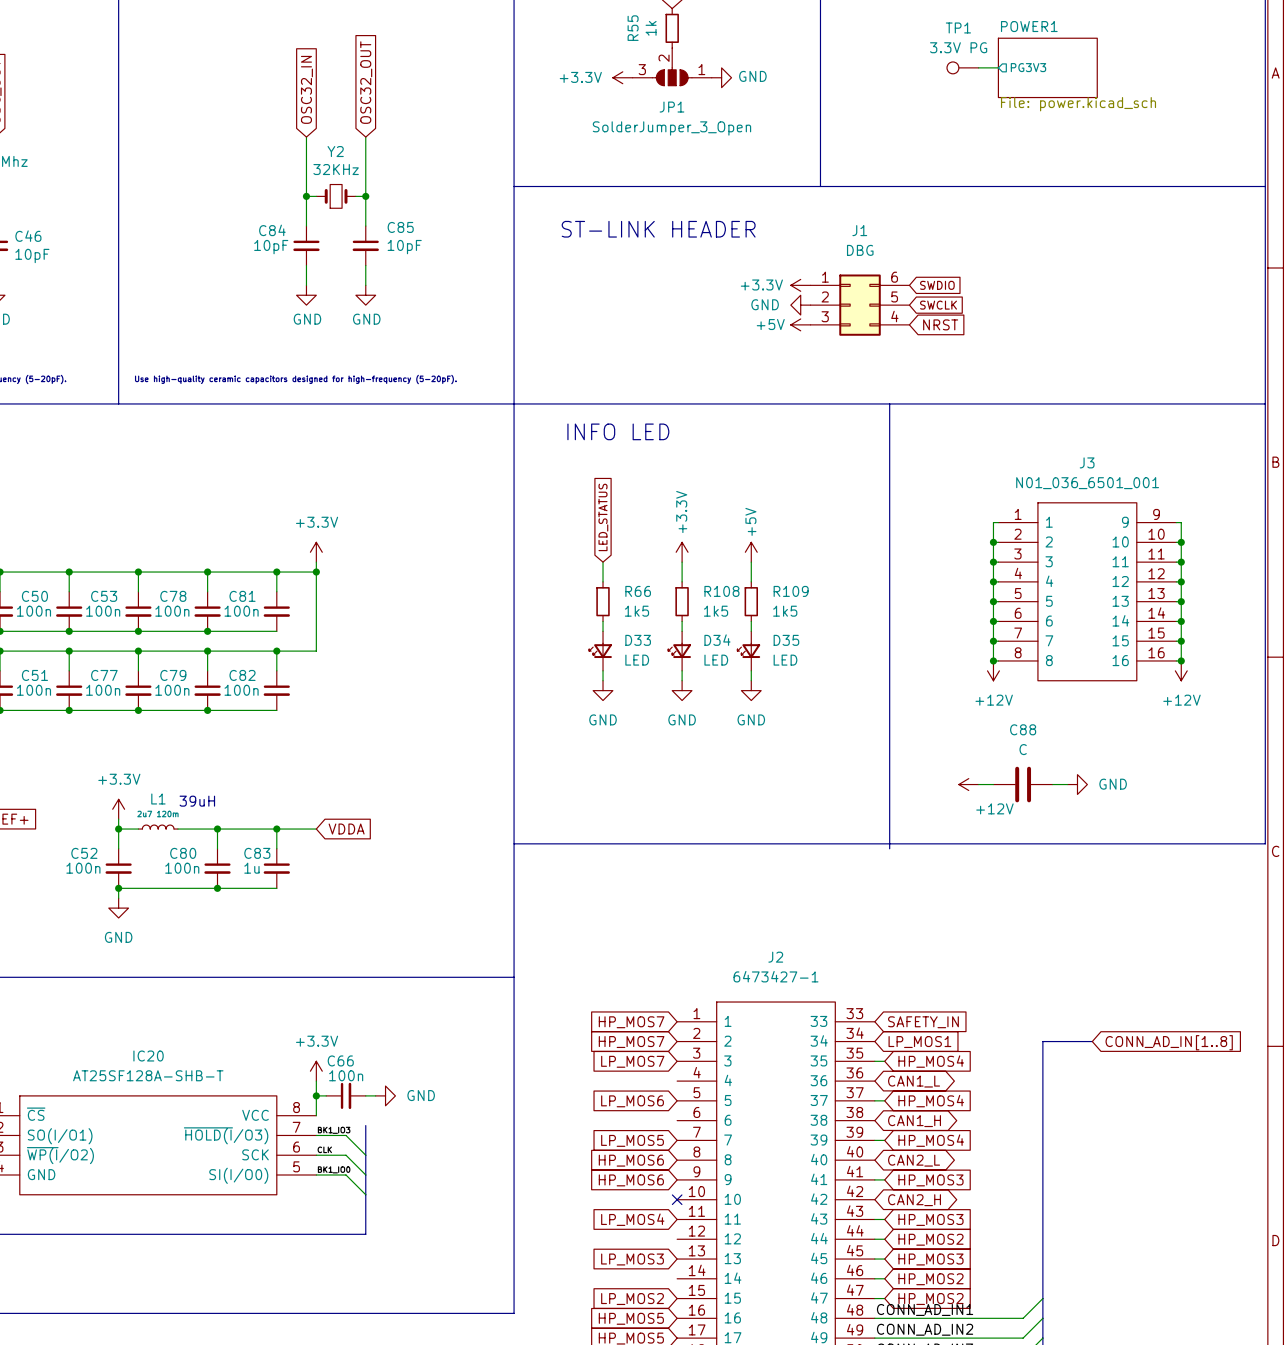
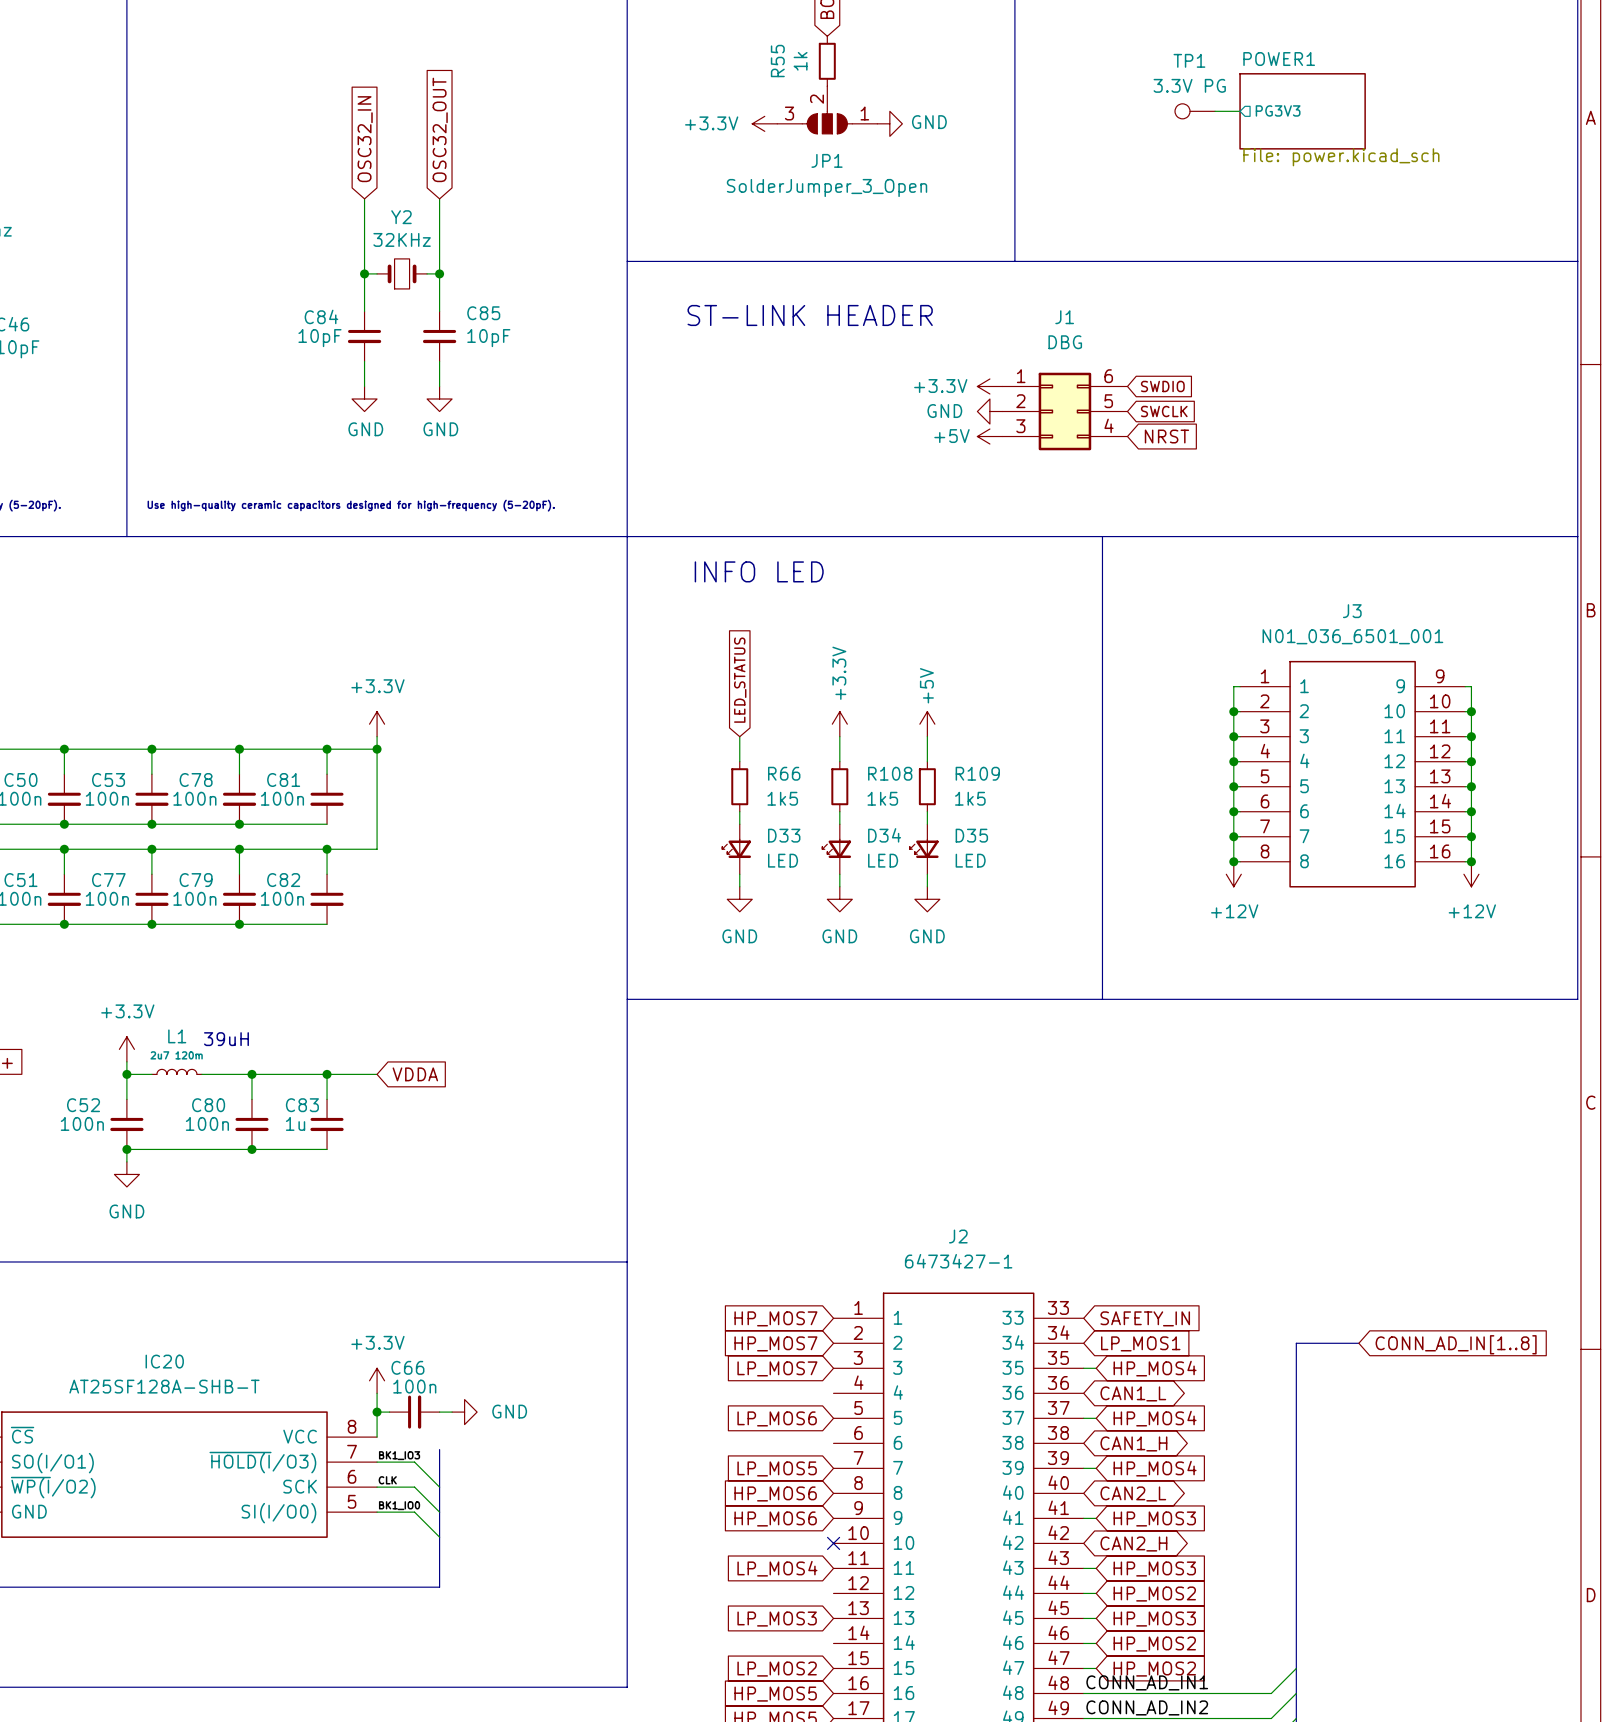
line: (889, 769) (889, 848) -> none
line: (1265, 769) (1265, 843) (514, 843) -> (1577, 999) (627, 999)
power symbol: +12V (968, 784) -> none
wire: (978, 784) (993, 784) -> none
C88: C (1023, 784) -> none
wire: (1052, 784) (1067, 784) -> none
power symbol: GND (1077, 784) -> none

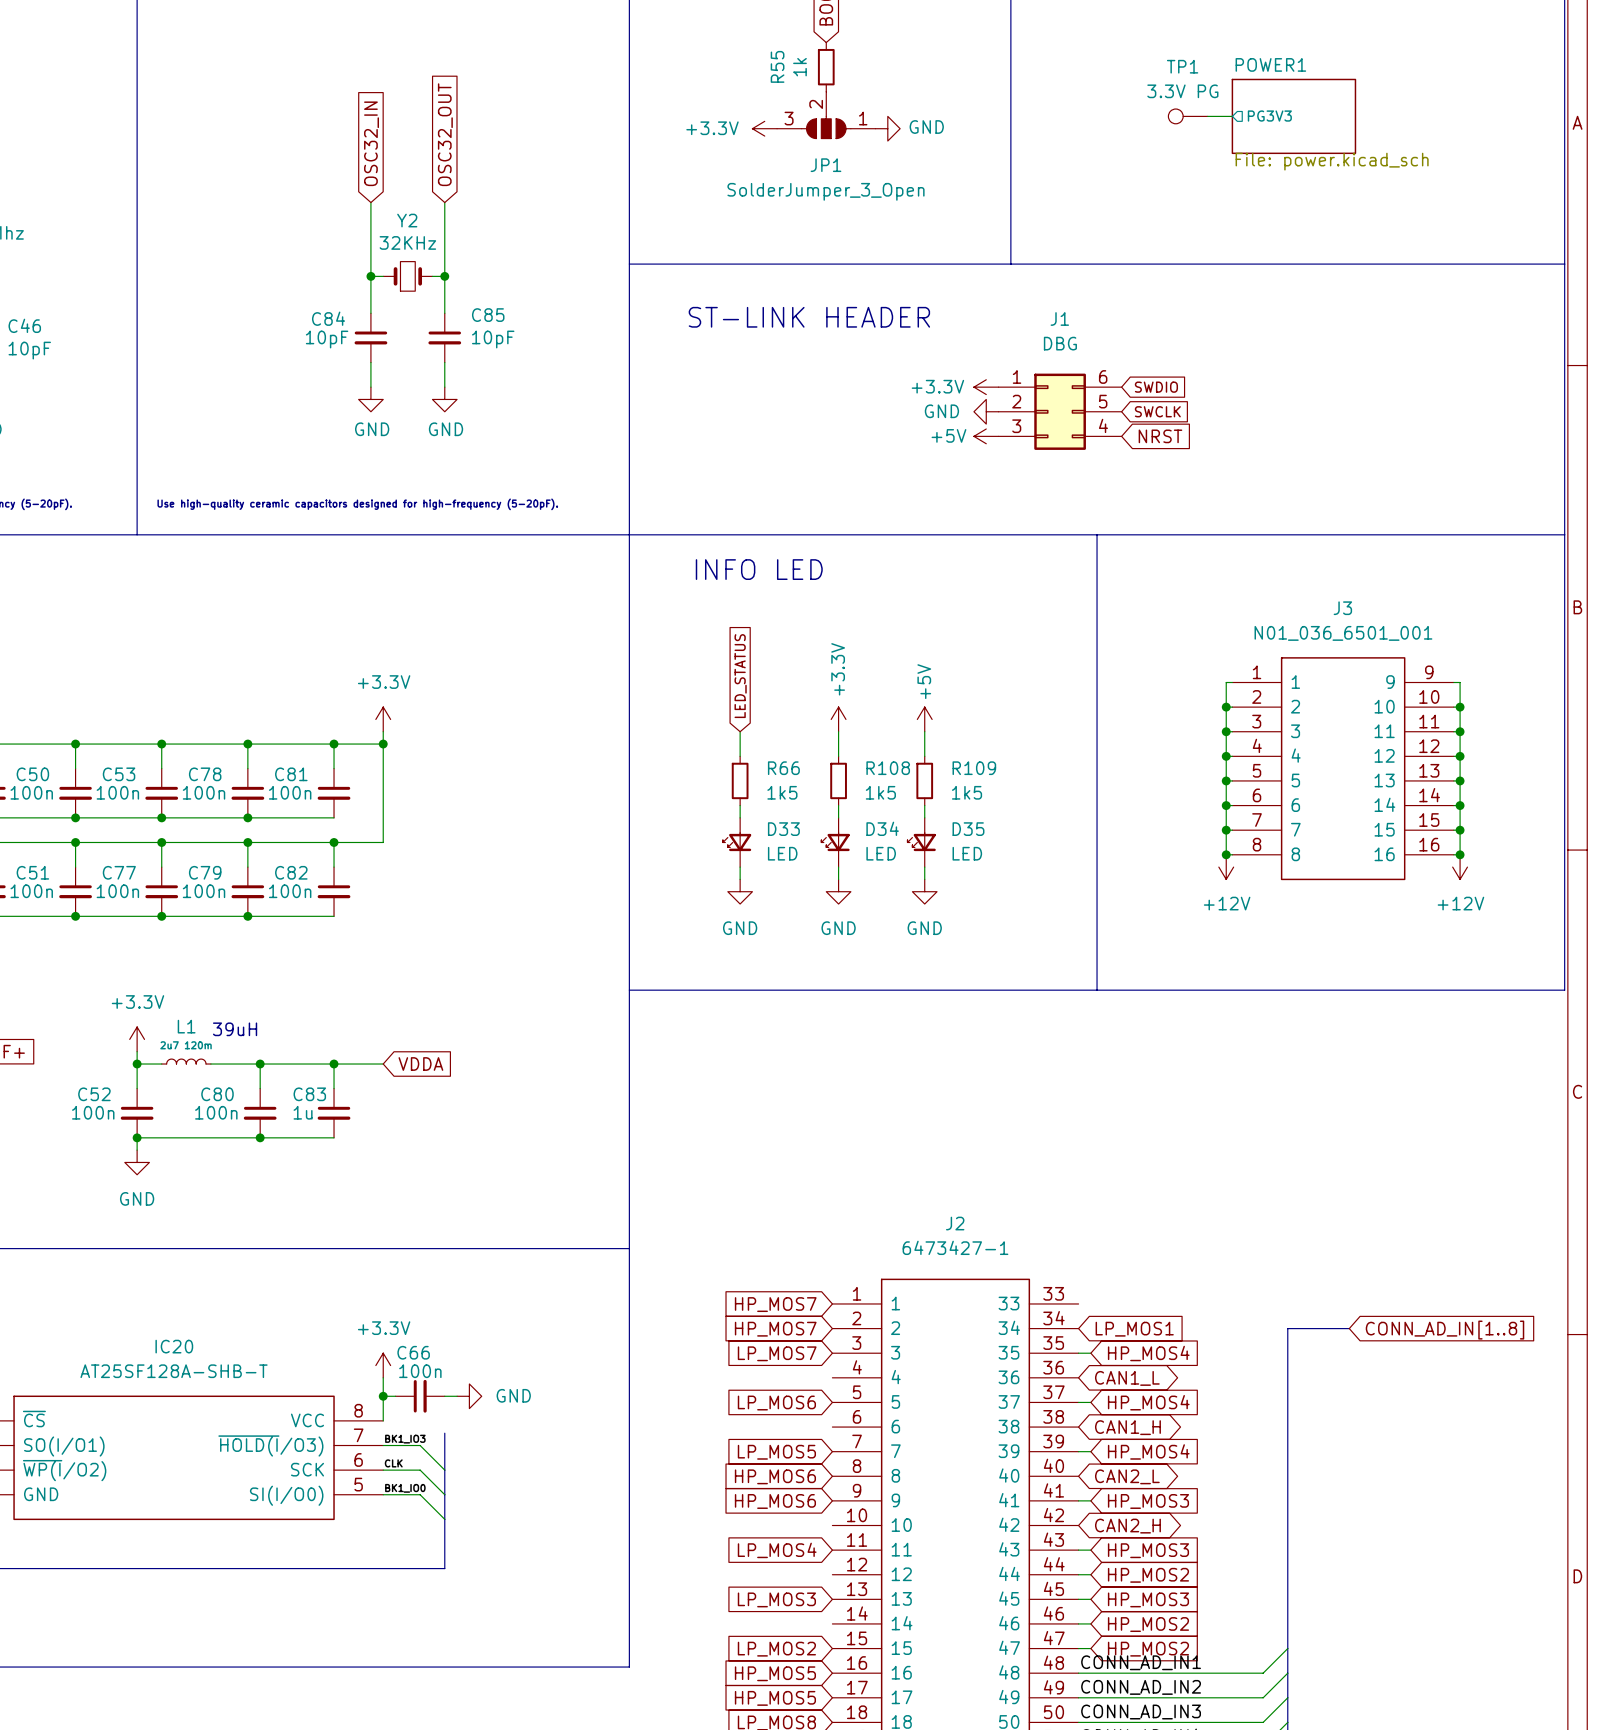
global label: SAFETY_IN (1145, 1318) -> none
no-connect mark: (833, 1543) -> none

